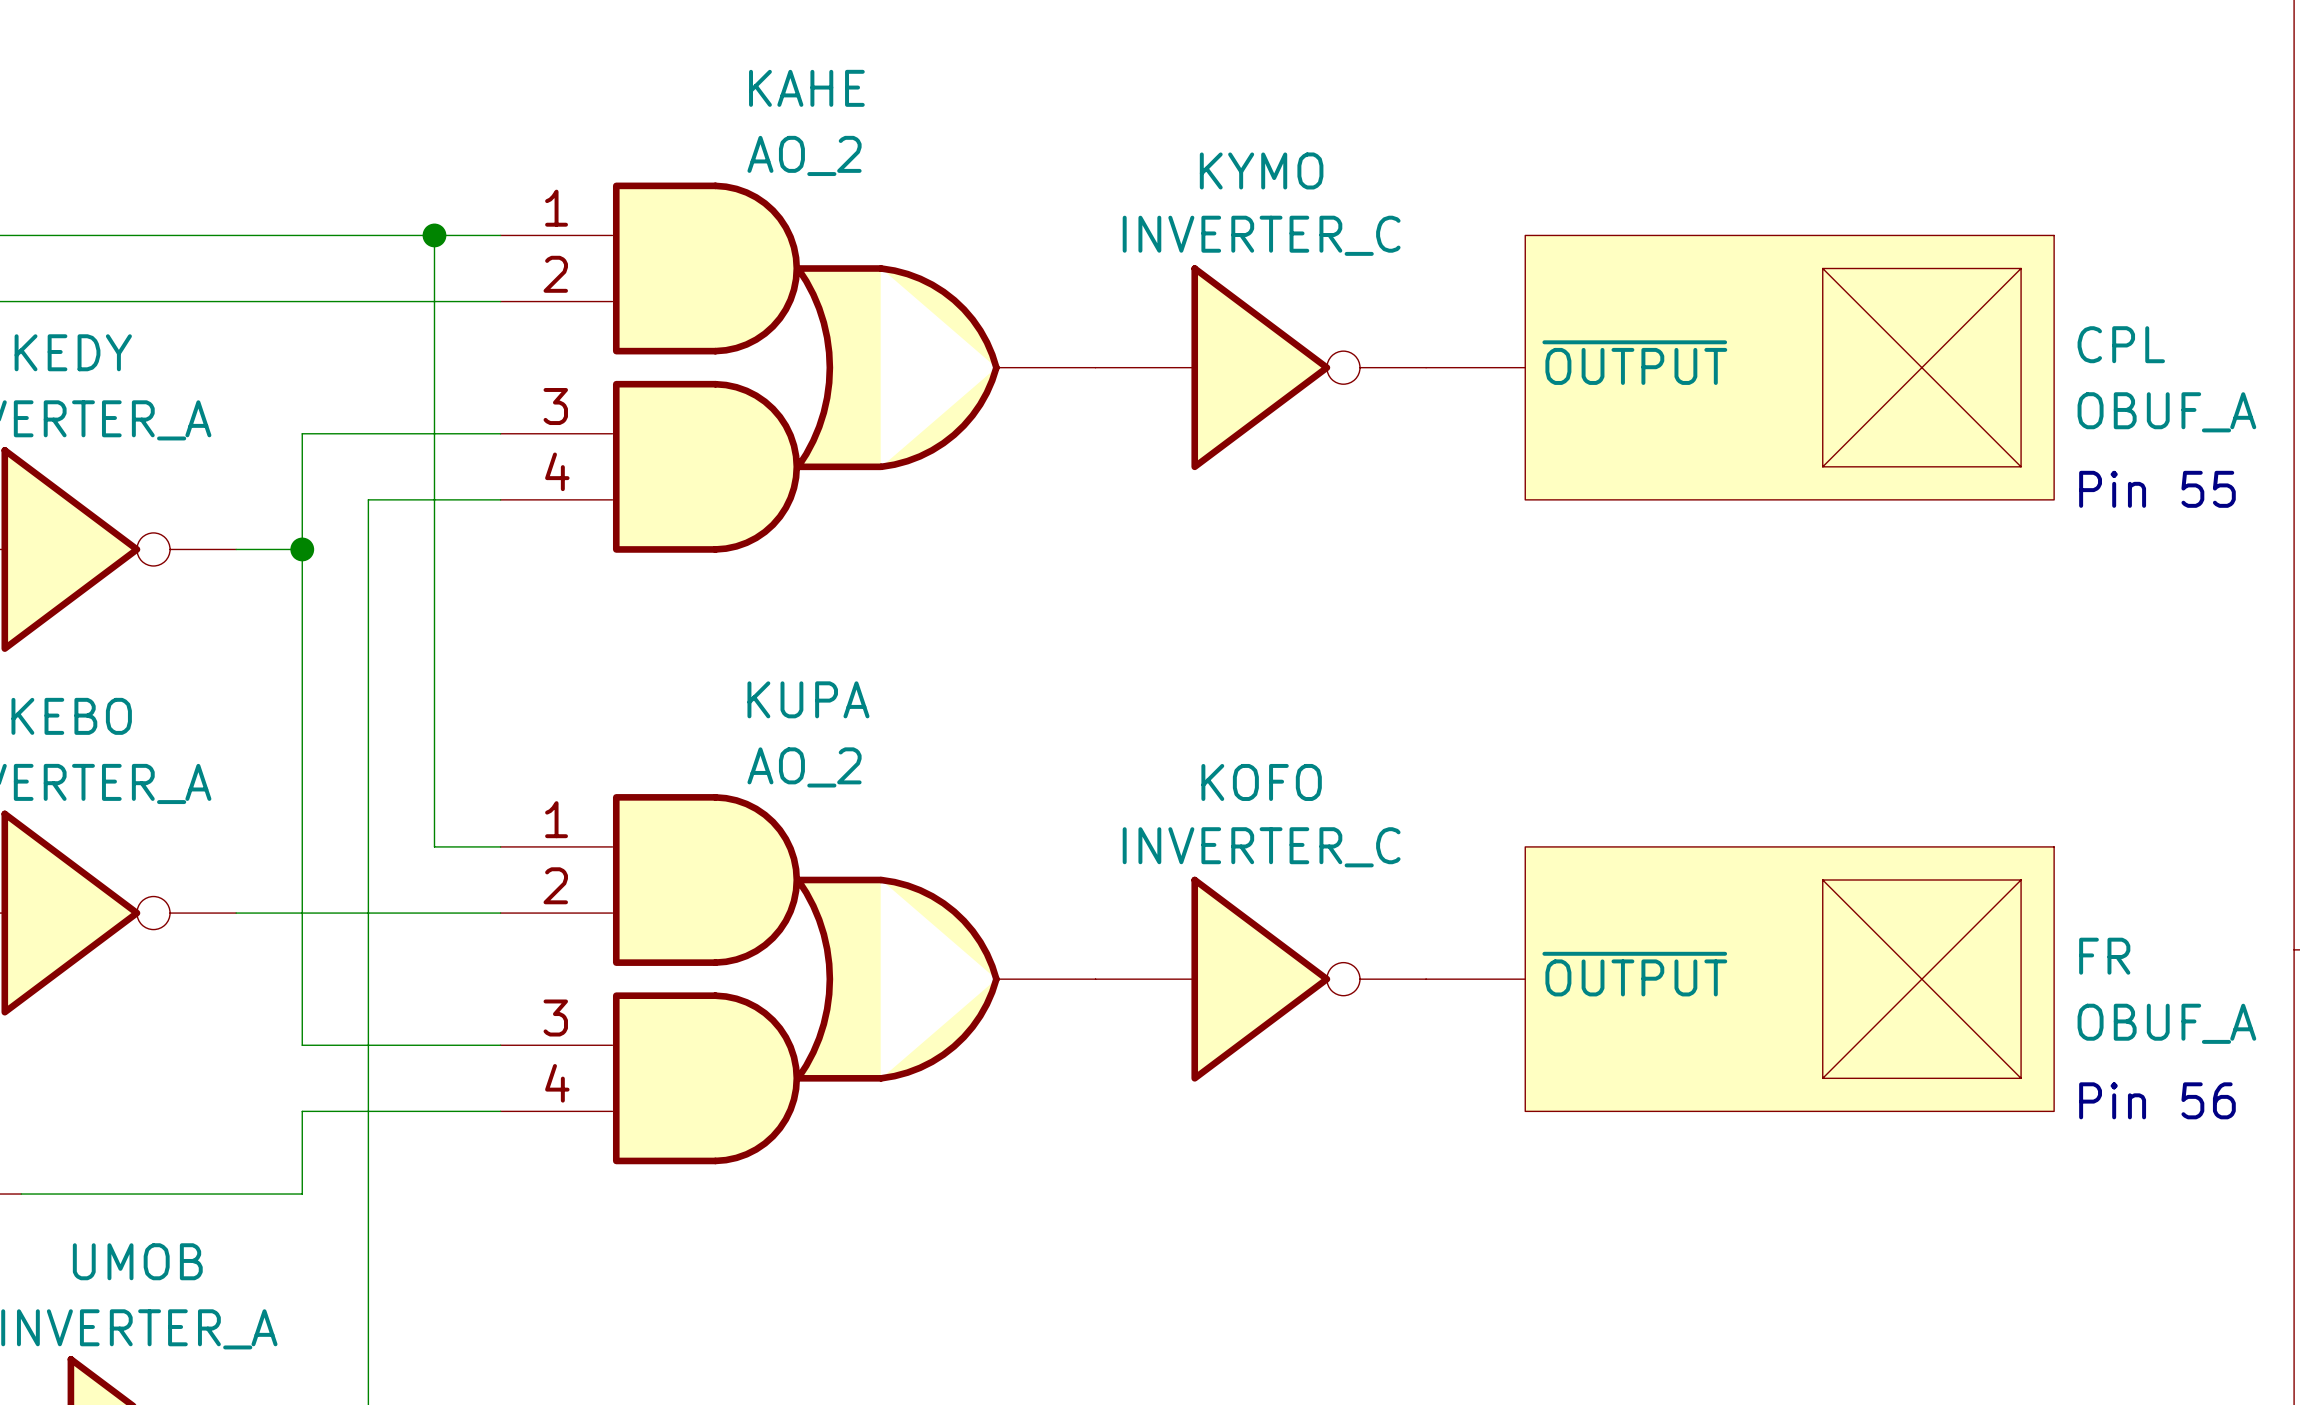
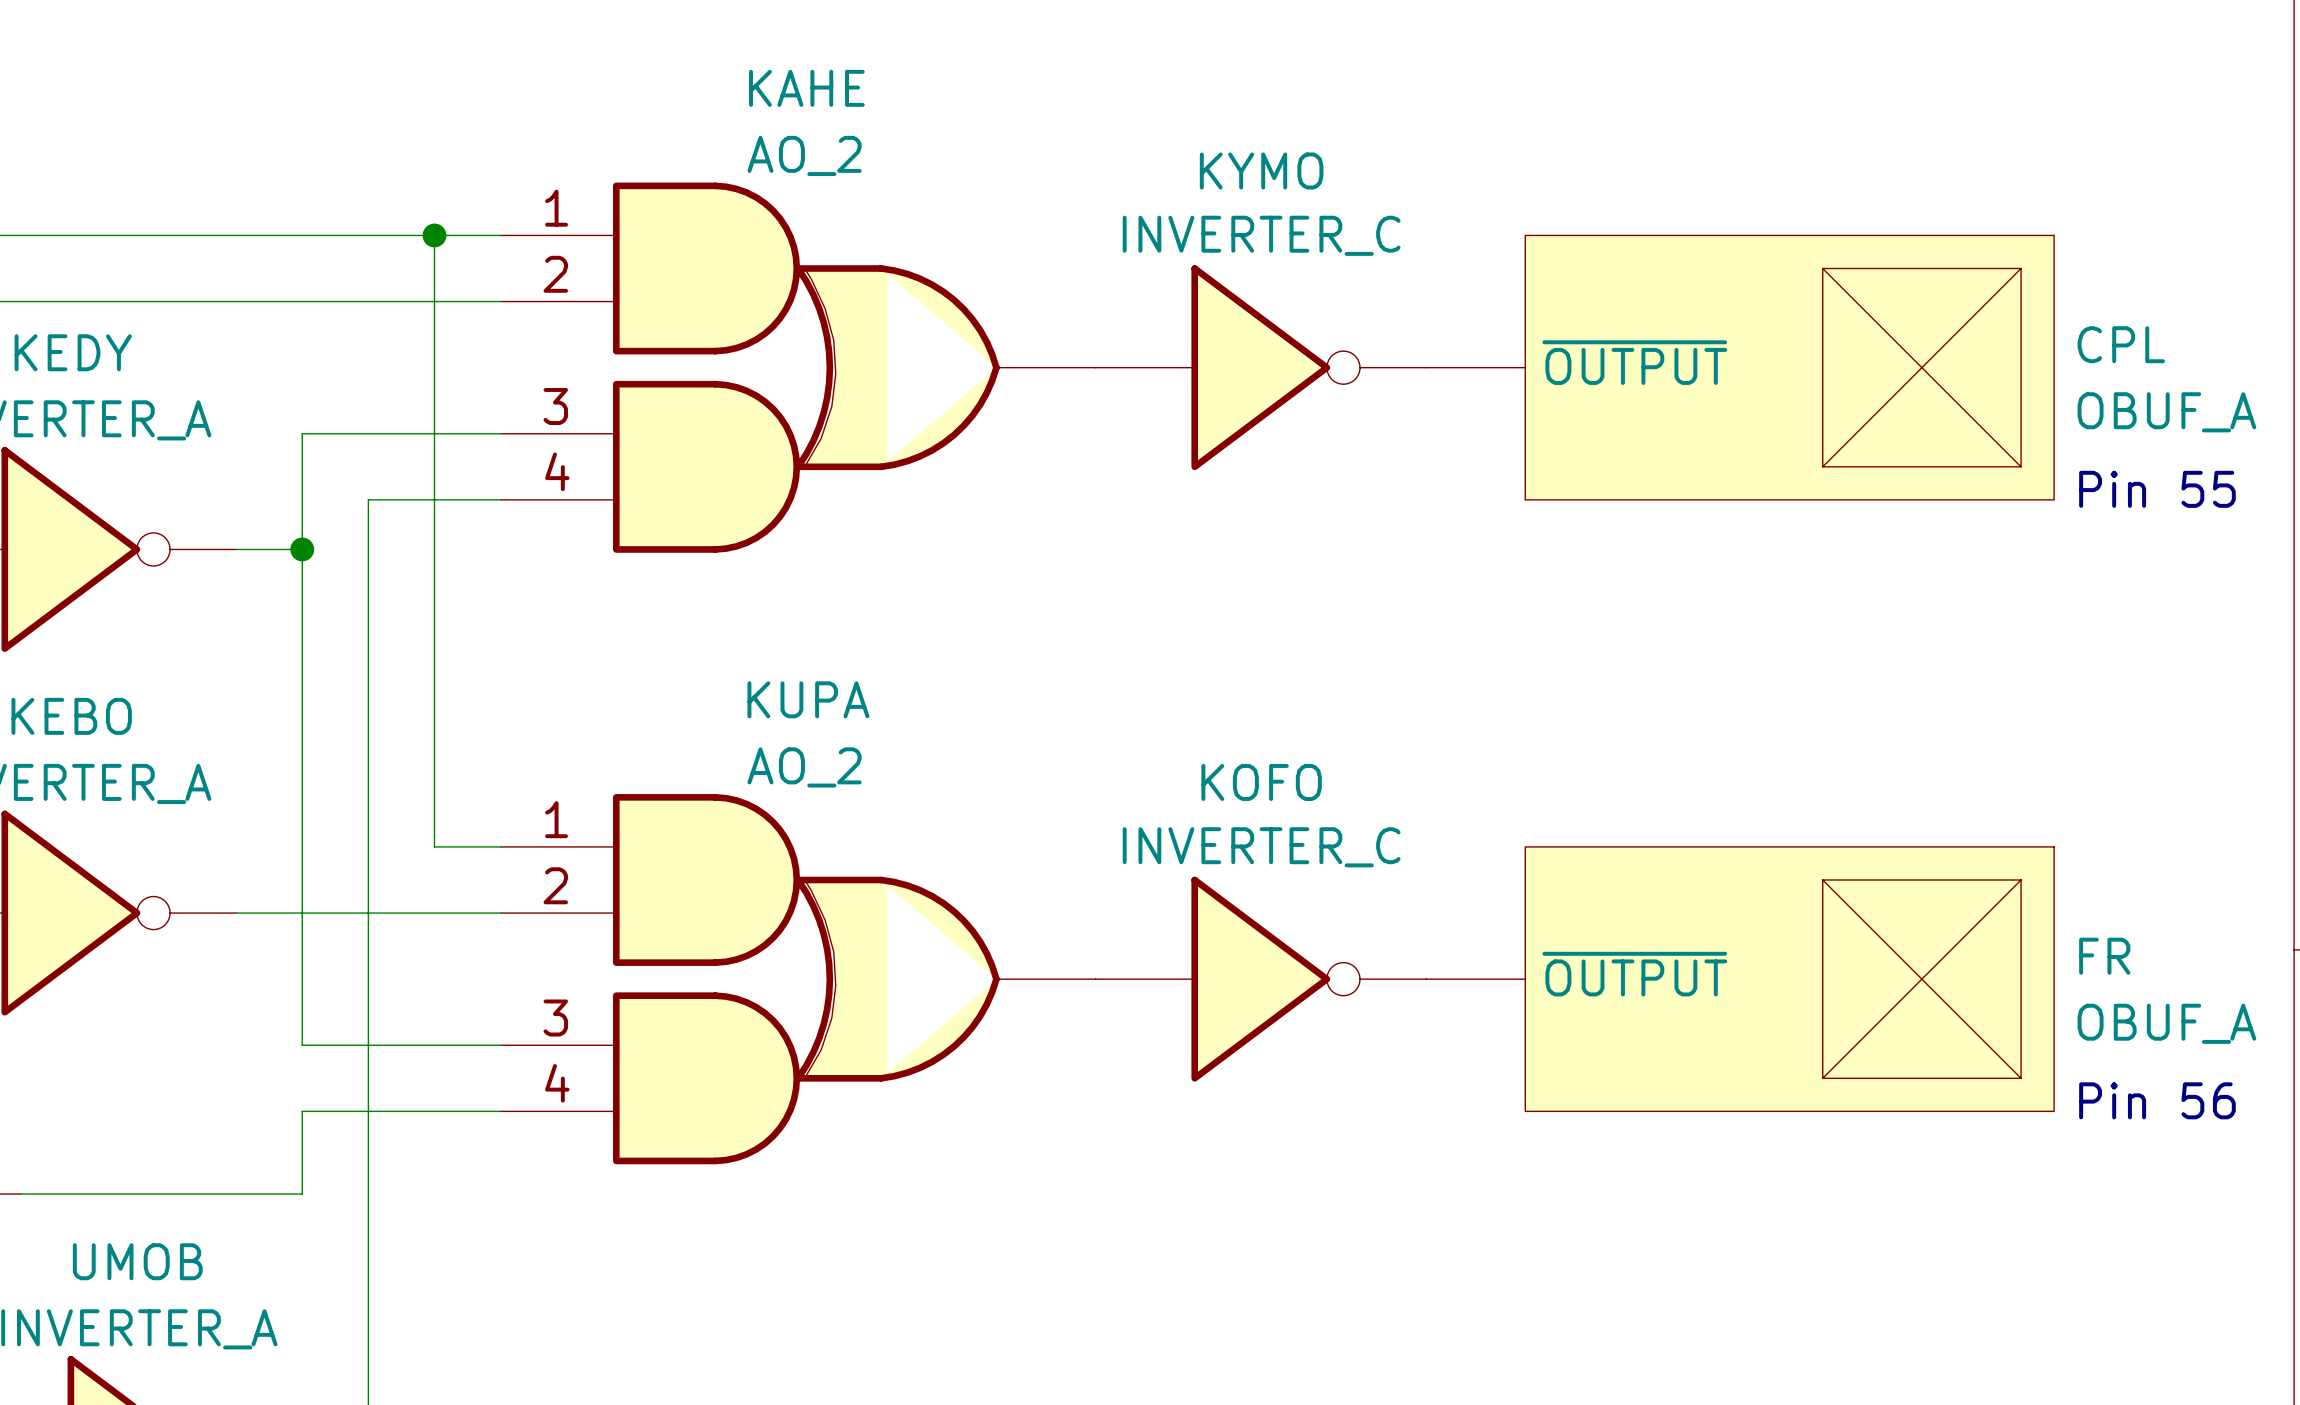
KAHE symbol: [500, 182, 1096, 553] -> [500, 182, 1096, 553]
KUPA symbol: [500, 794, 1096, 1165] -> [500, 794, 1096, 1165]

